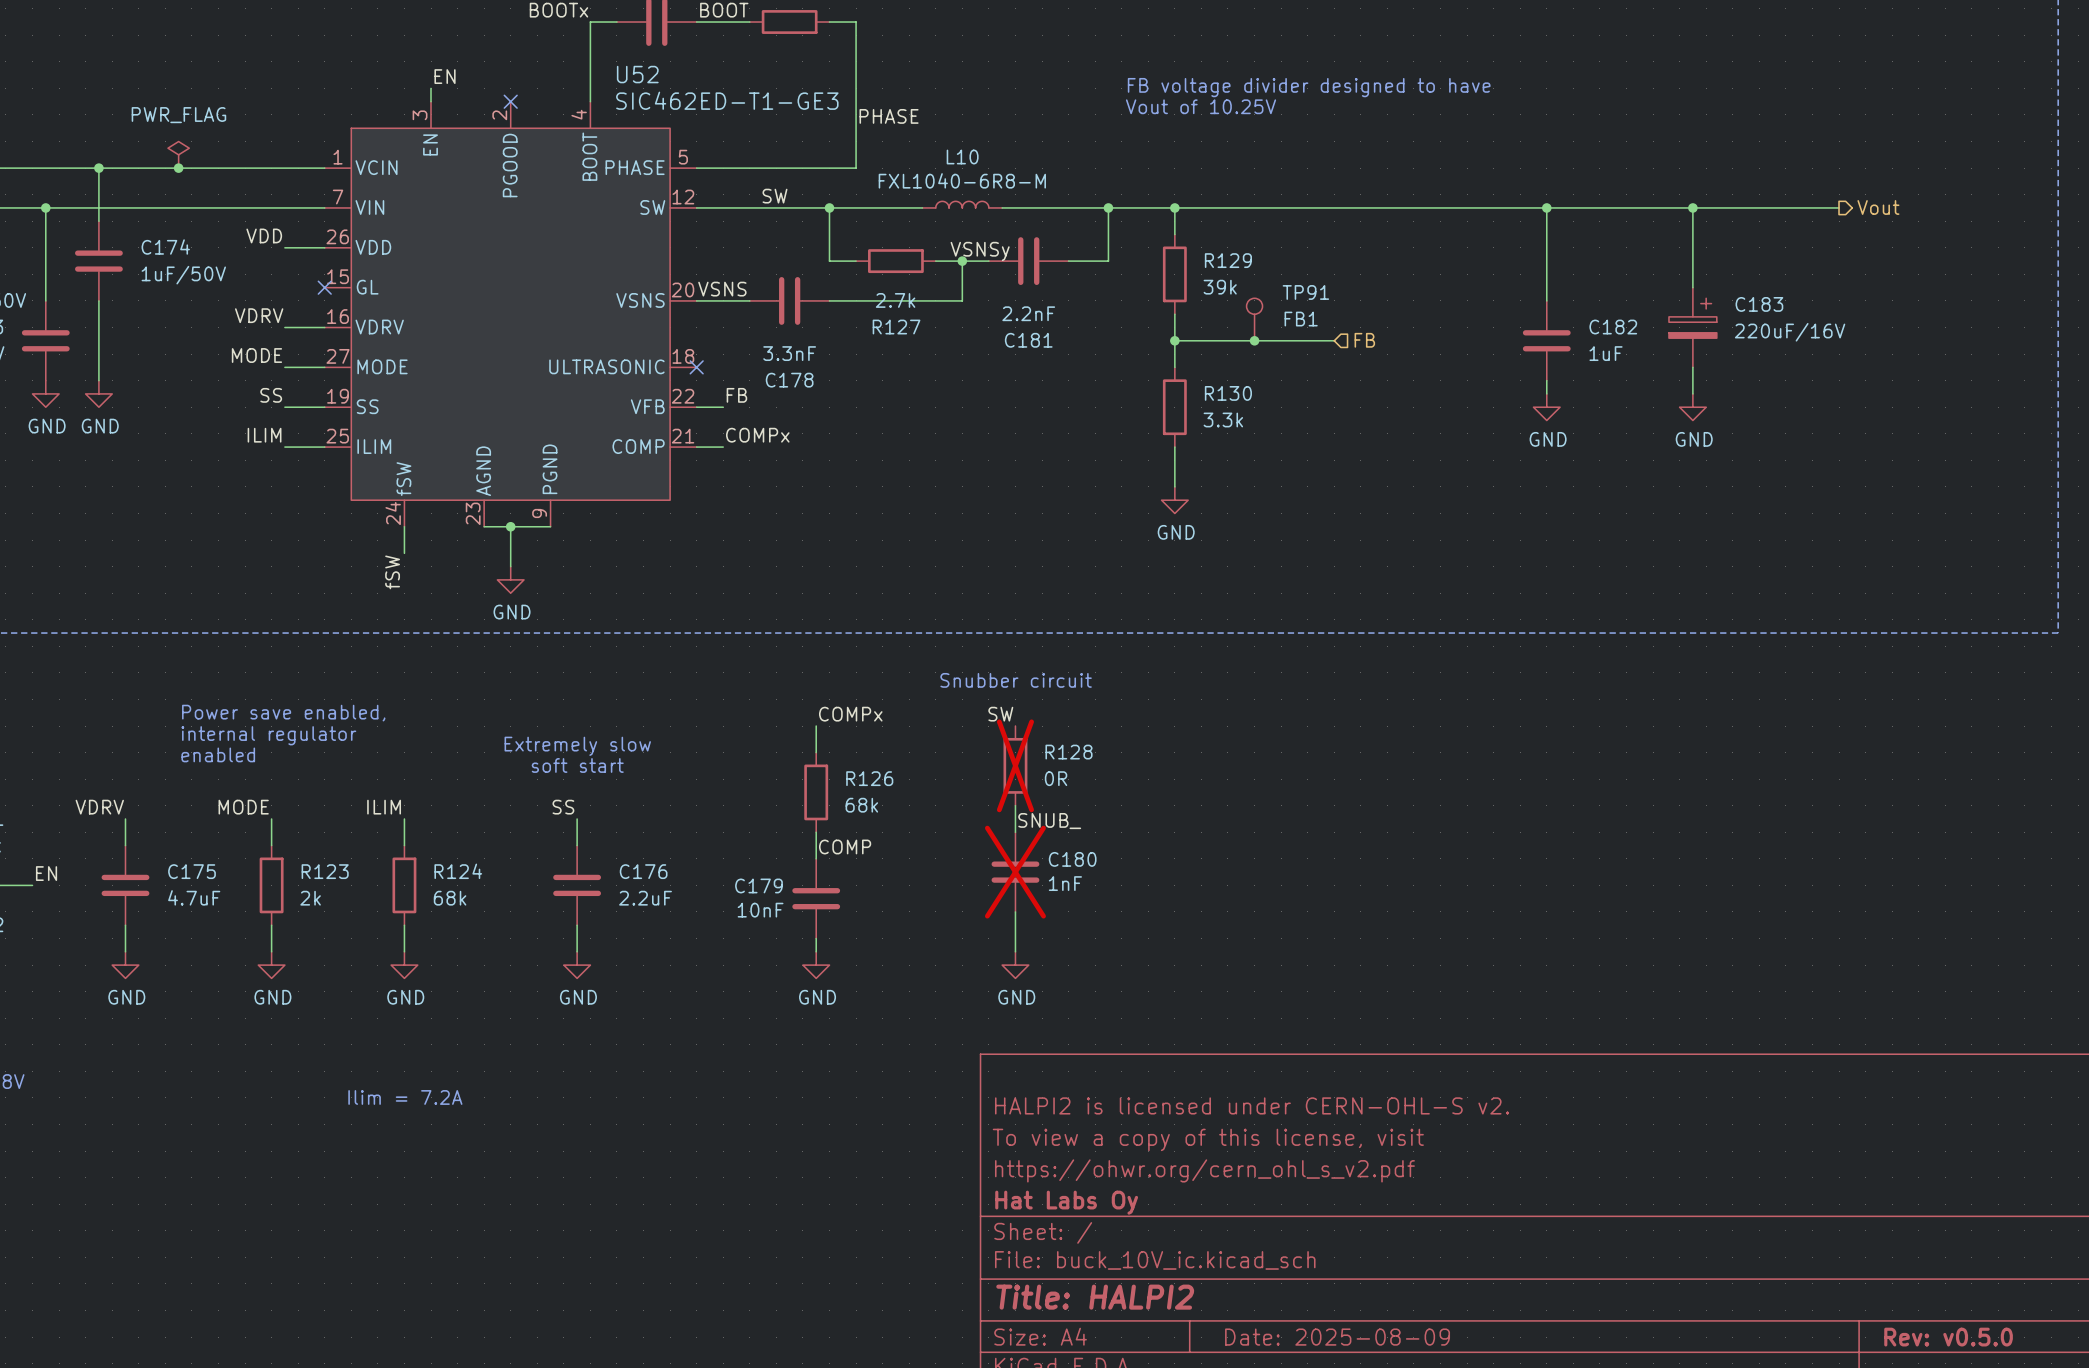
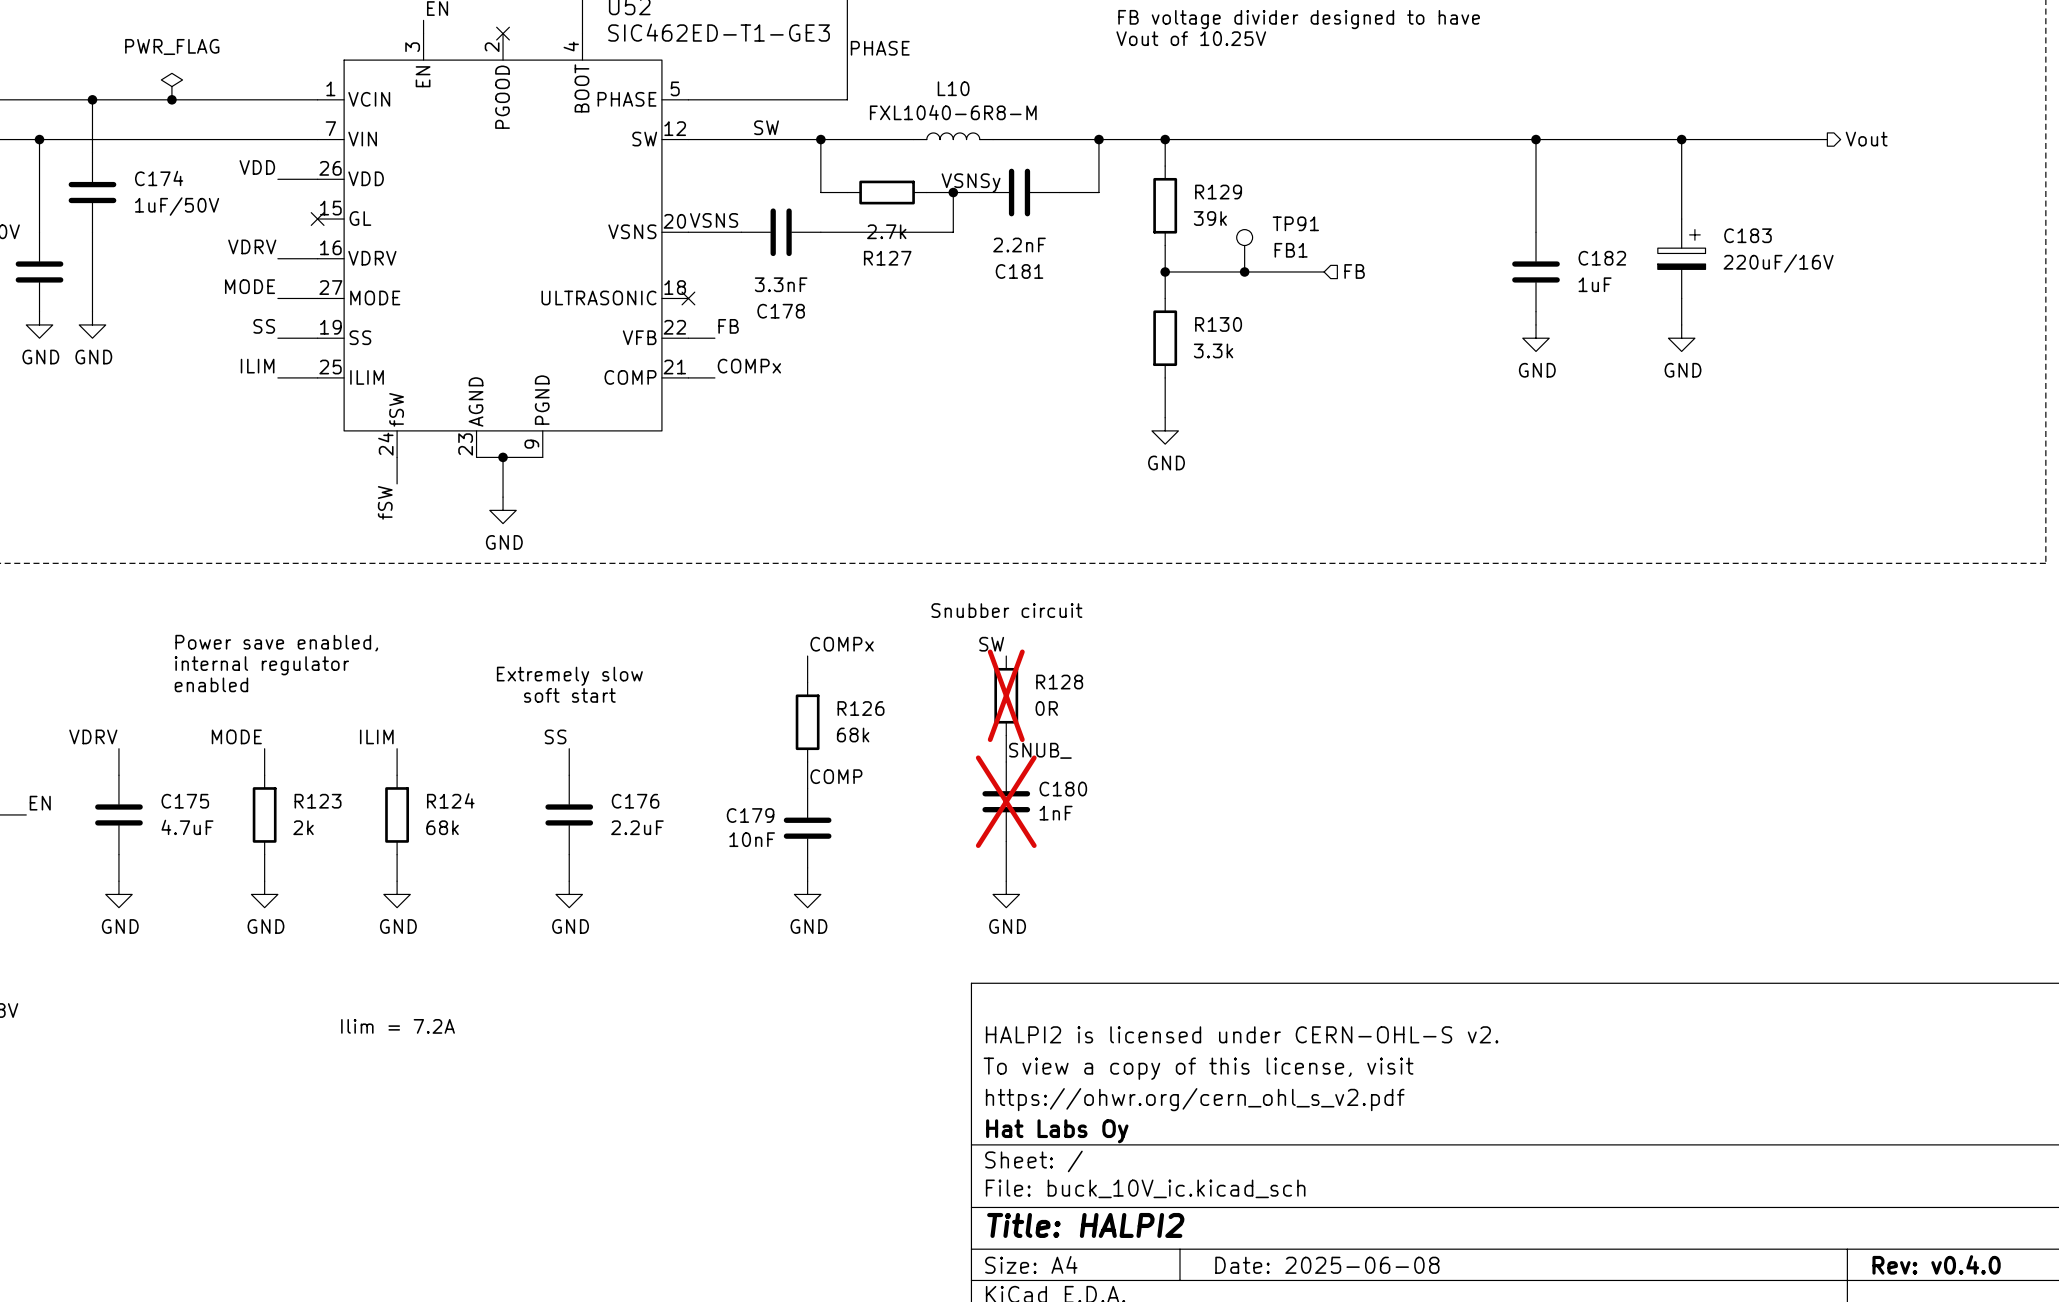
title block: Date: 2025-08-09 (1337, 1337) -> Date: 2025-06-08 (1327, 1265)
title block: Rev: v0.5.0 (1948, 1337) -> Rev: v0.4.0 (1936, 1264)

